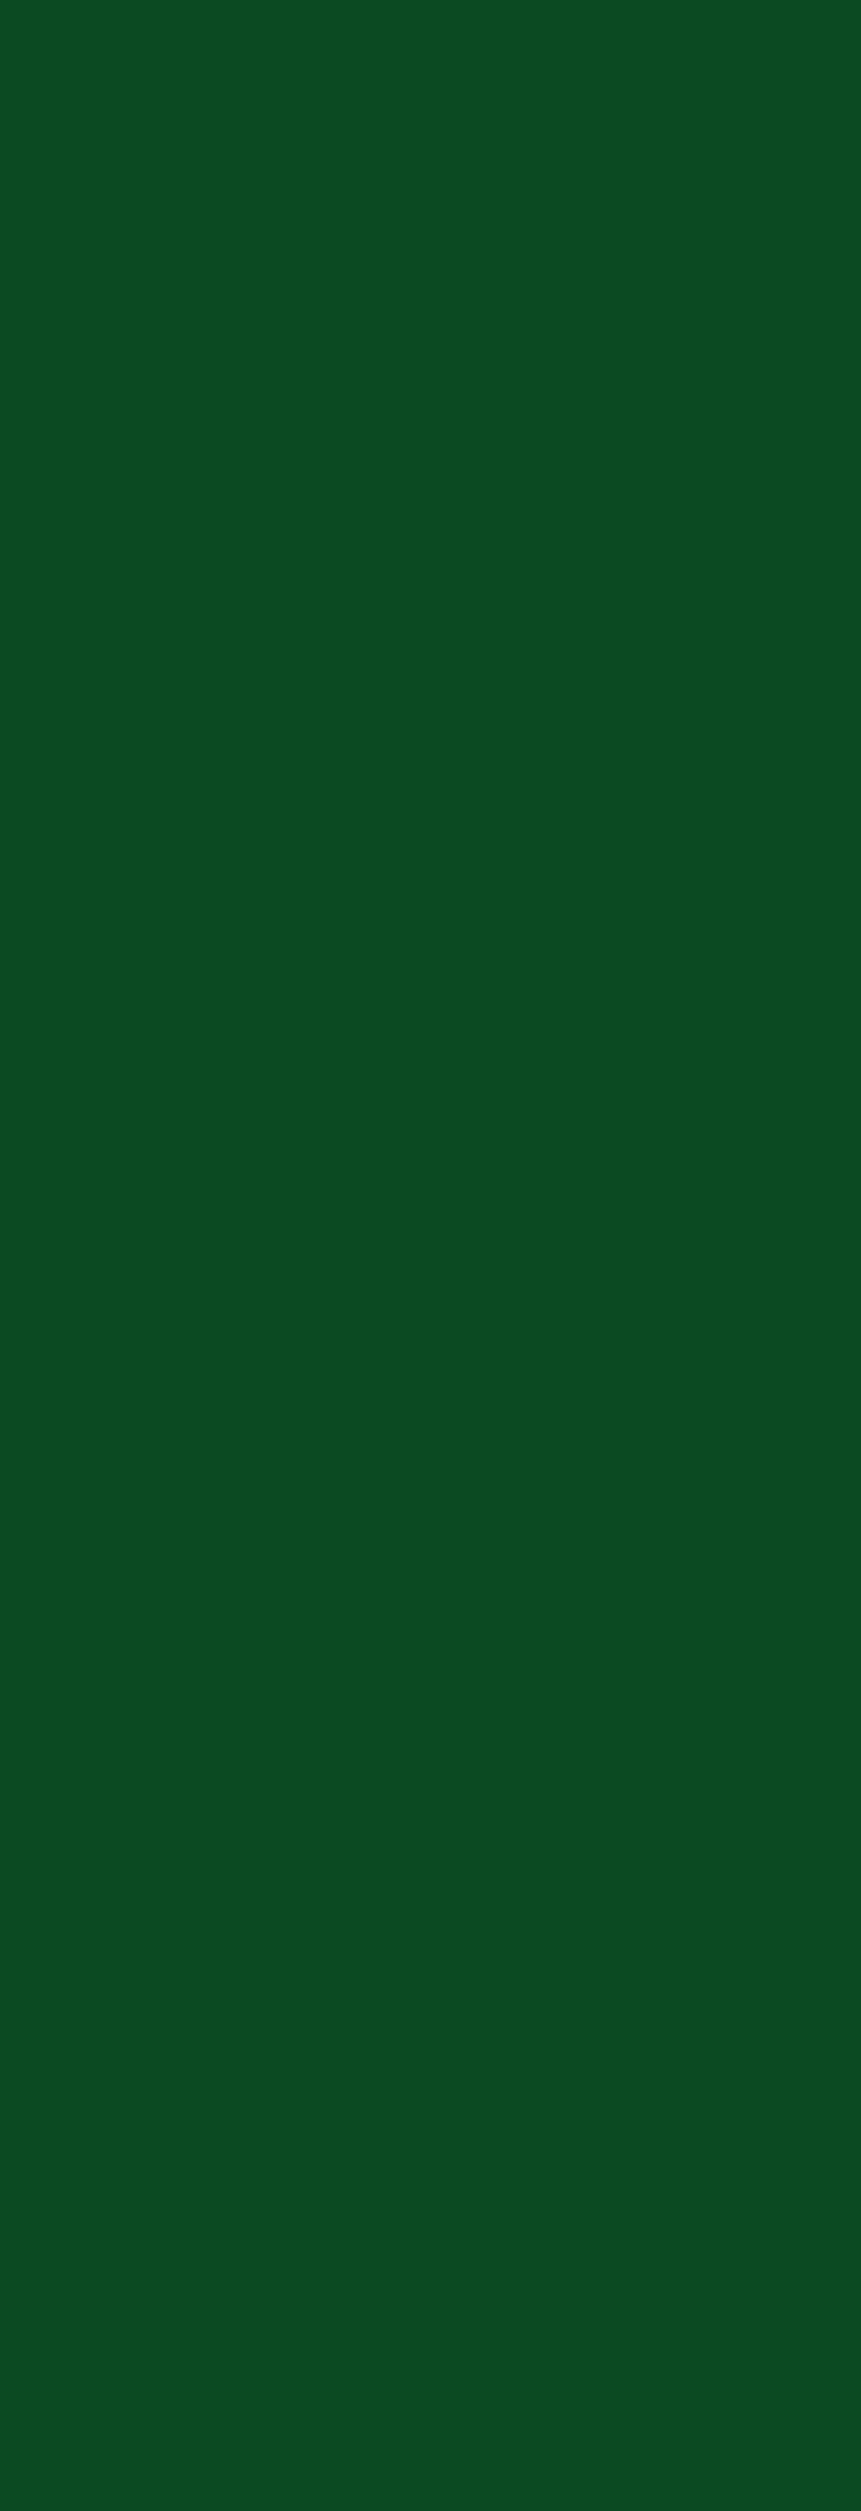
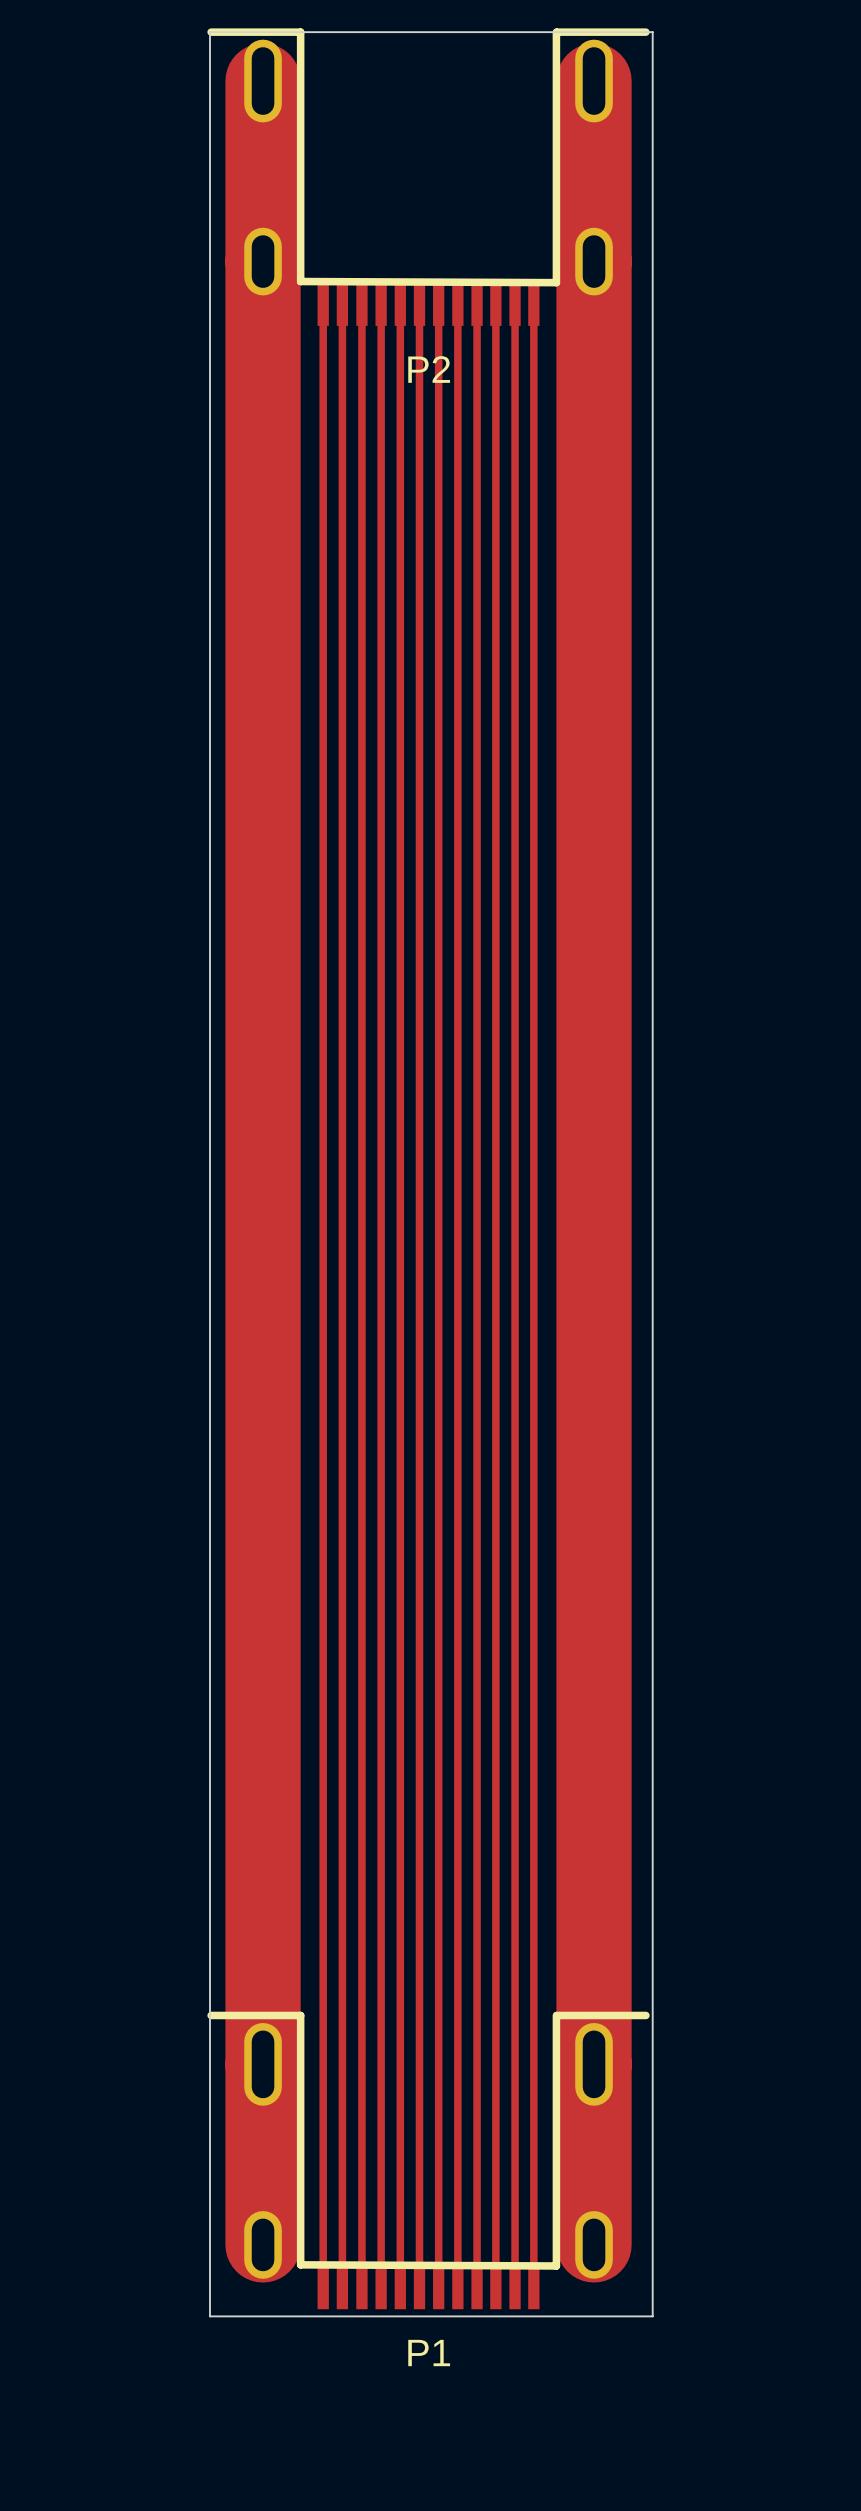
board edge: none -> (210, 32) (652, 32) (652, 2316) (210, 2316) (210, 32)
track: none -> (263, 81) (263, 2244)
track: none -> (594, 81) (594, 2244)
P2: none -> (428, 177)
track: none -> (323, 304) (323, 2287)
track: none -> (342, 304) (342, 2287)
track: none -> (361, 304) (361, 2287)
track: none -> (381, 304) (381, 2287)
track: none -> (400, 304) (400, 2287)
track: none -> (419, 304) (419, 2287)
track: none -> (438, 304) (438, 2287)
track: none -> (457, 304) (457, 2287)
track: none -> (477, 304) (477, 2287)
track: none -> (495, 304) (495, 2287)
track: none -> (515, 304) (515, 2287)
track: none -> (533, 304) (533, 2287)
P1: none -> (428, 2160)

